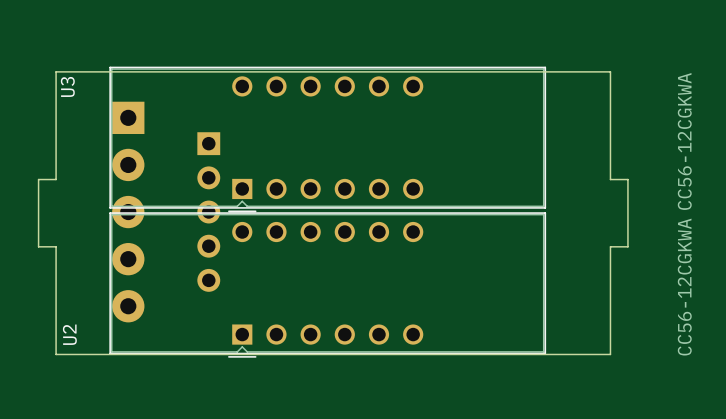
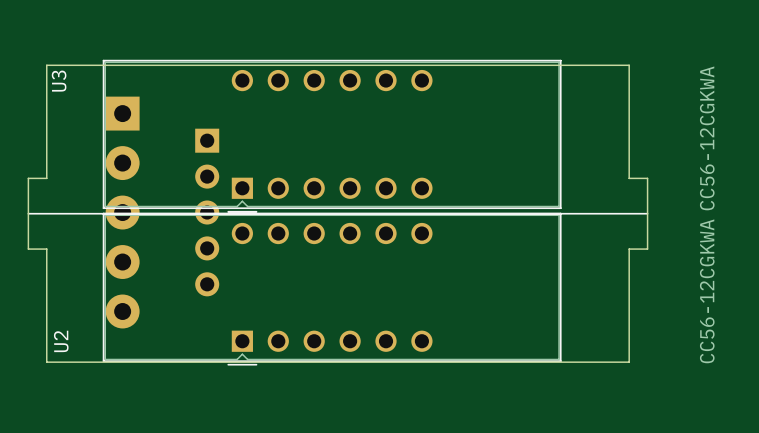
line: none -> (28, 213) (647, 213)

